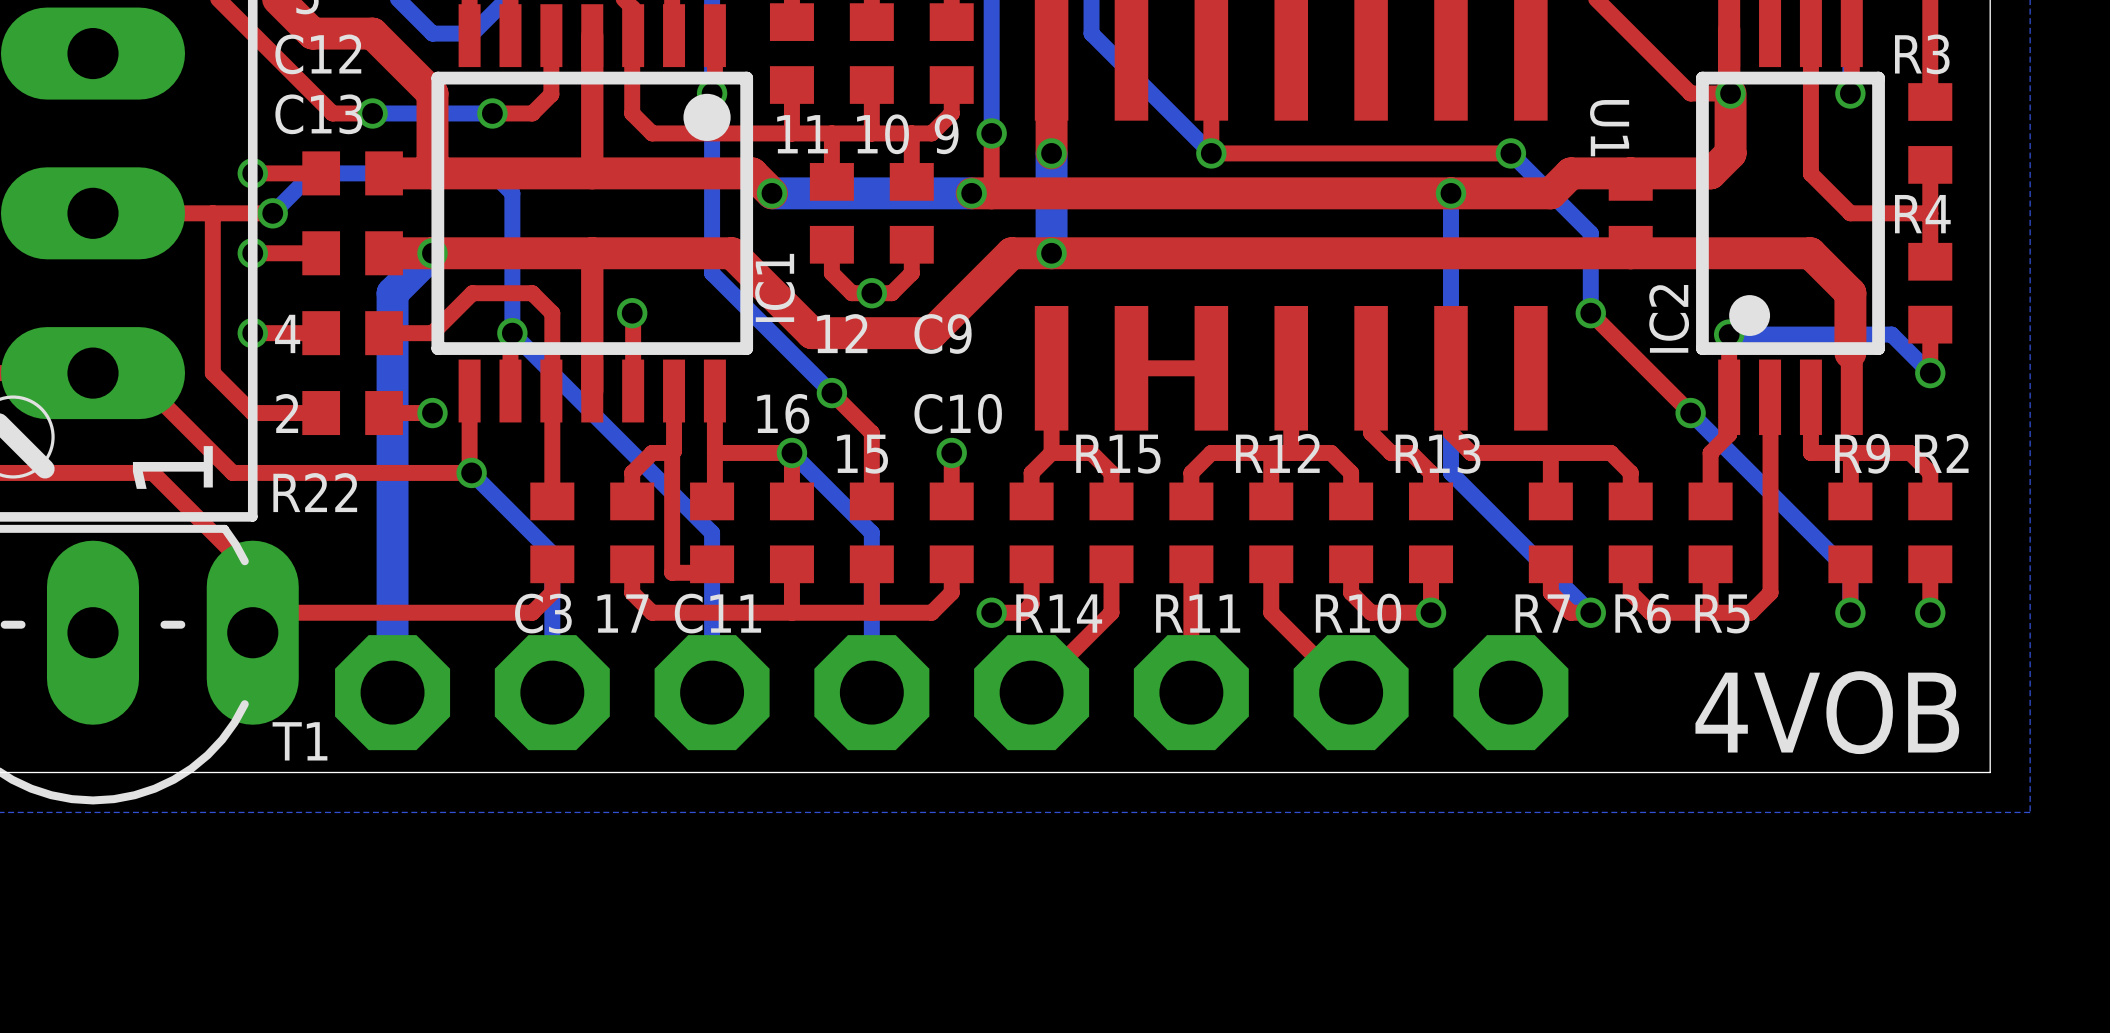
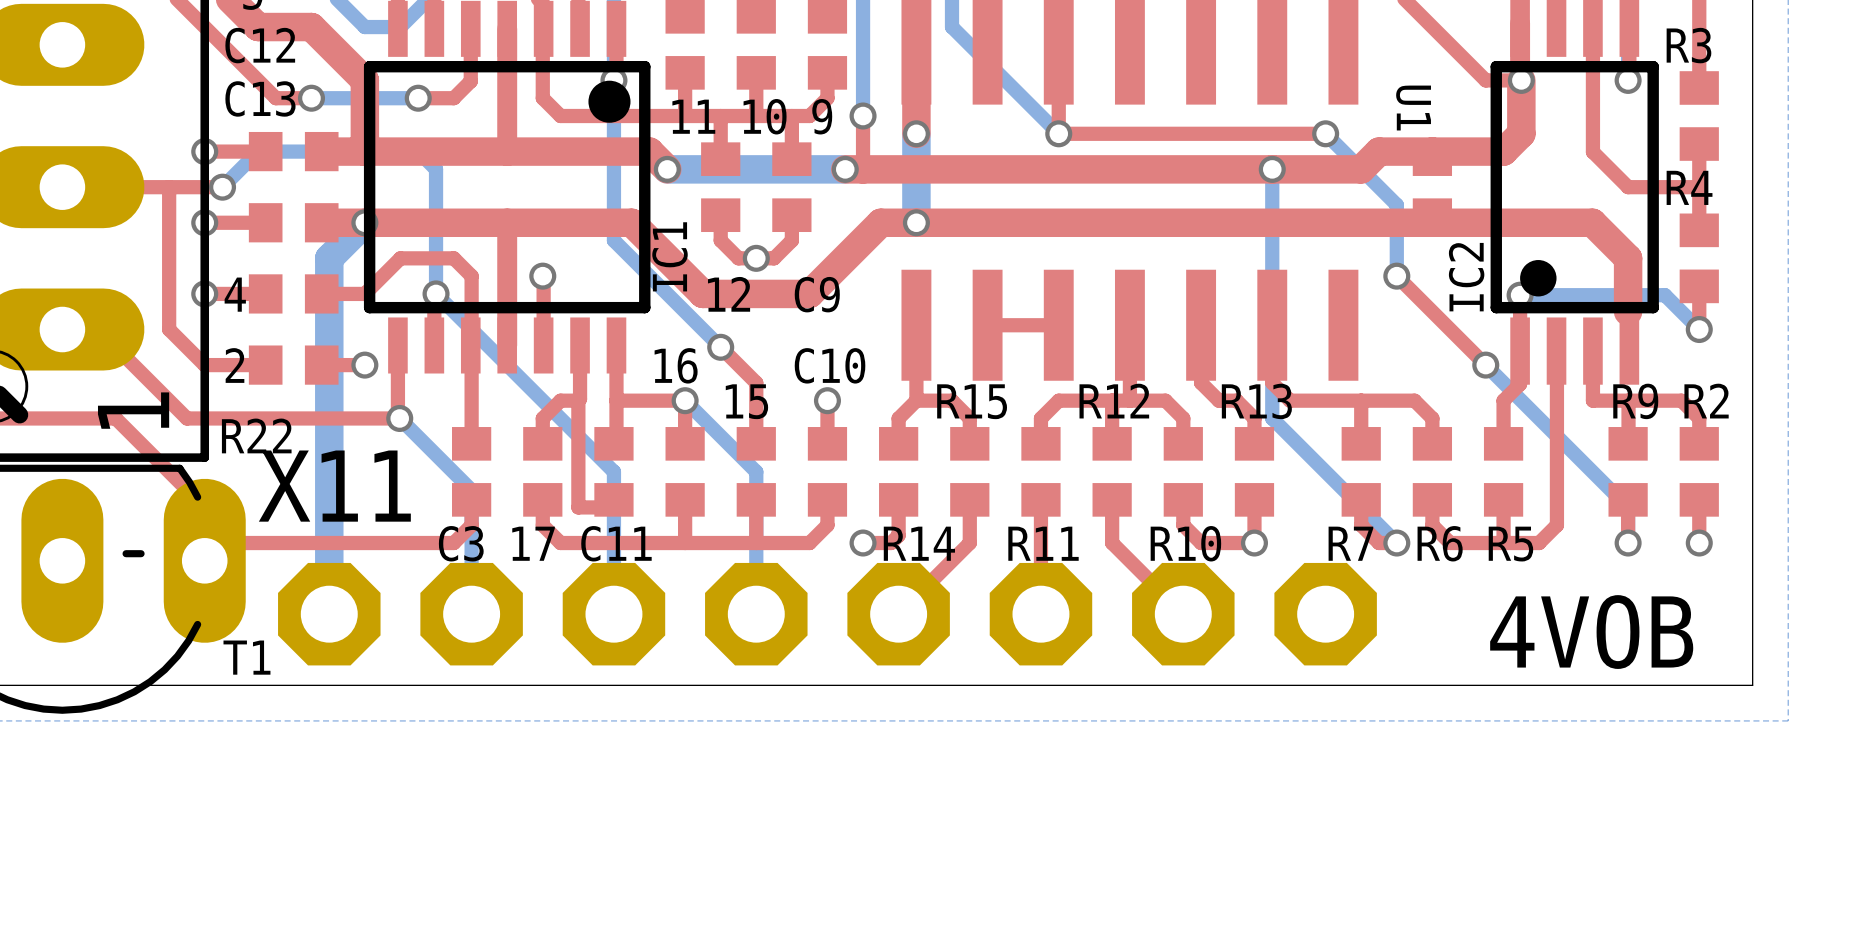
X11: none -> (827, 614)

